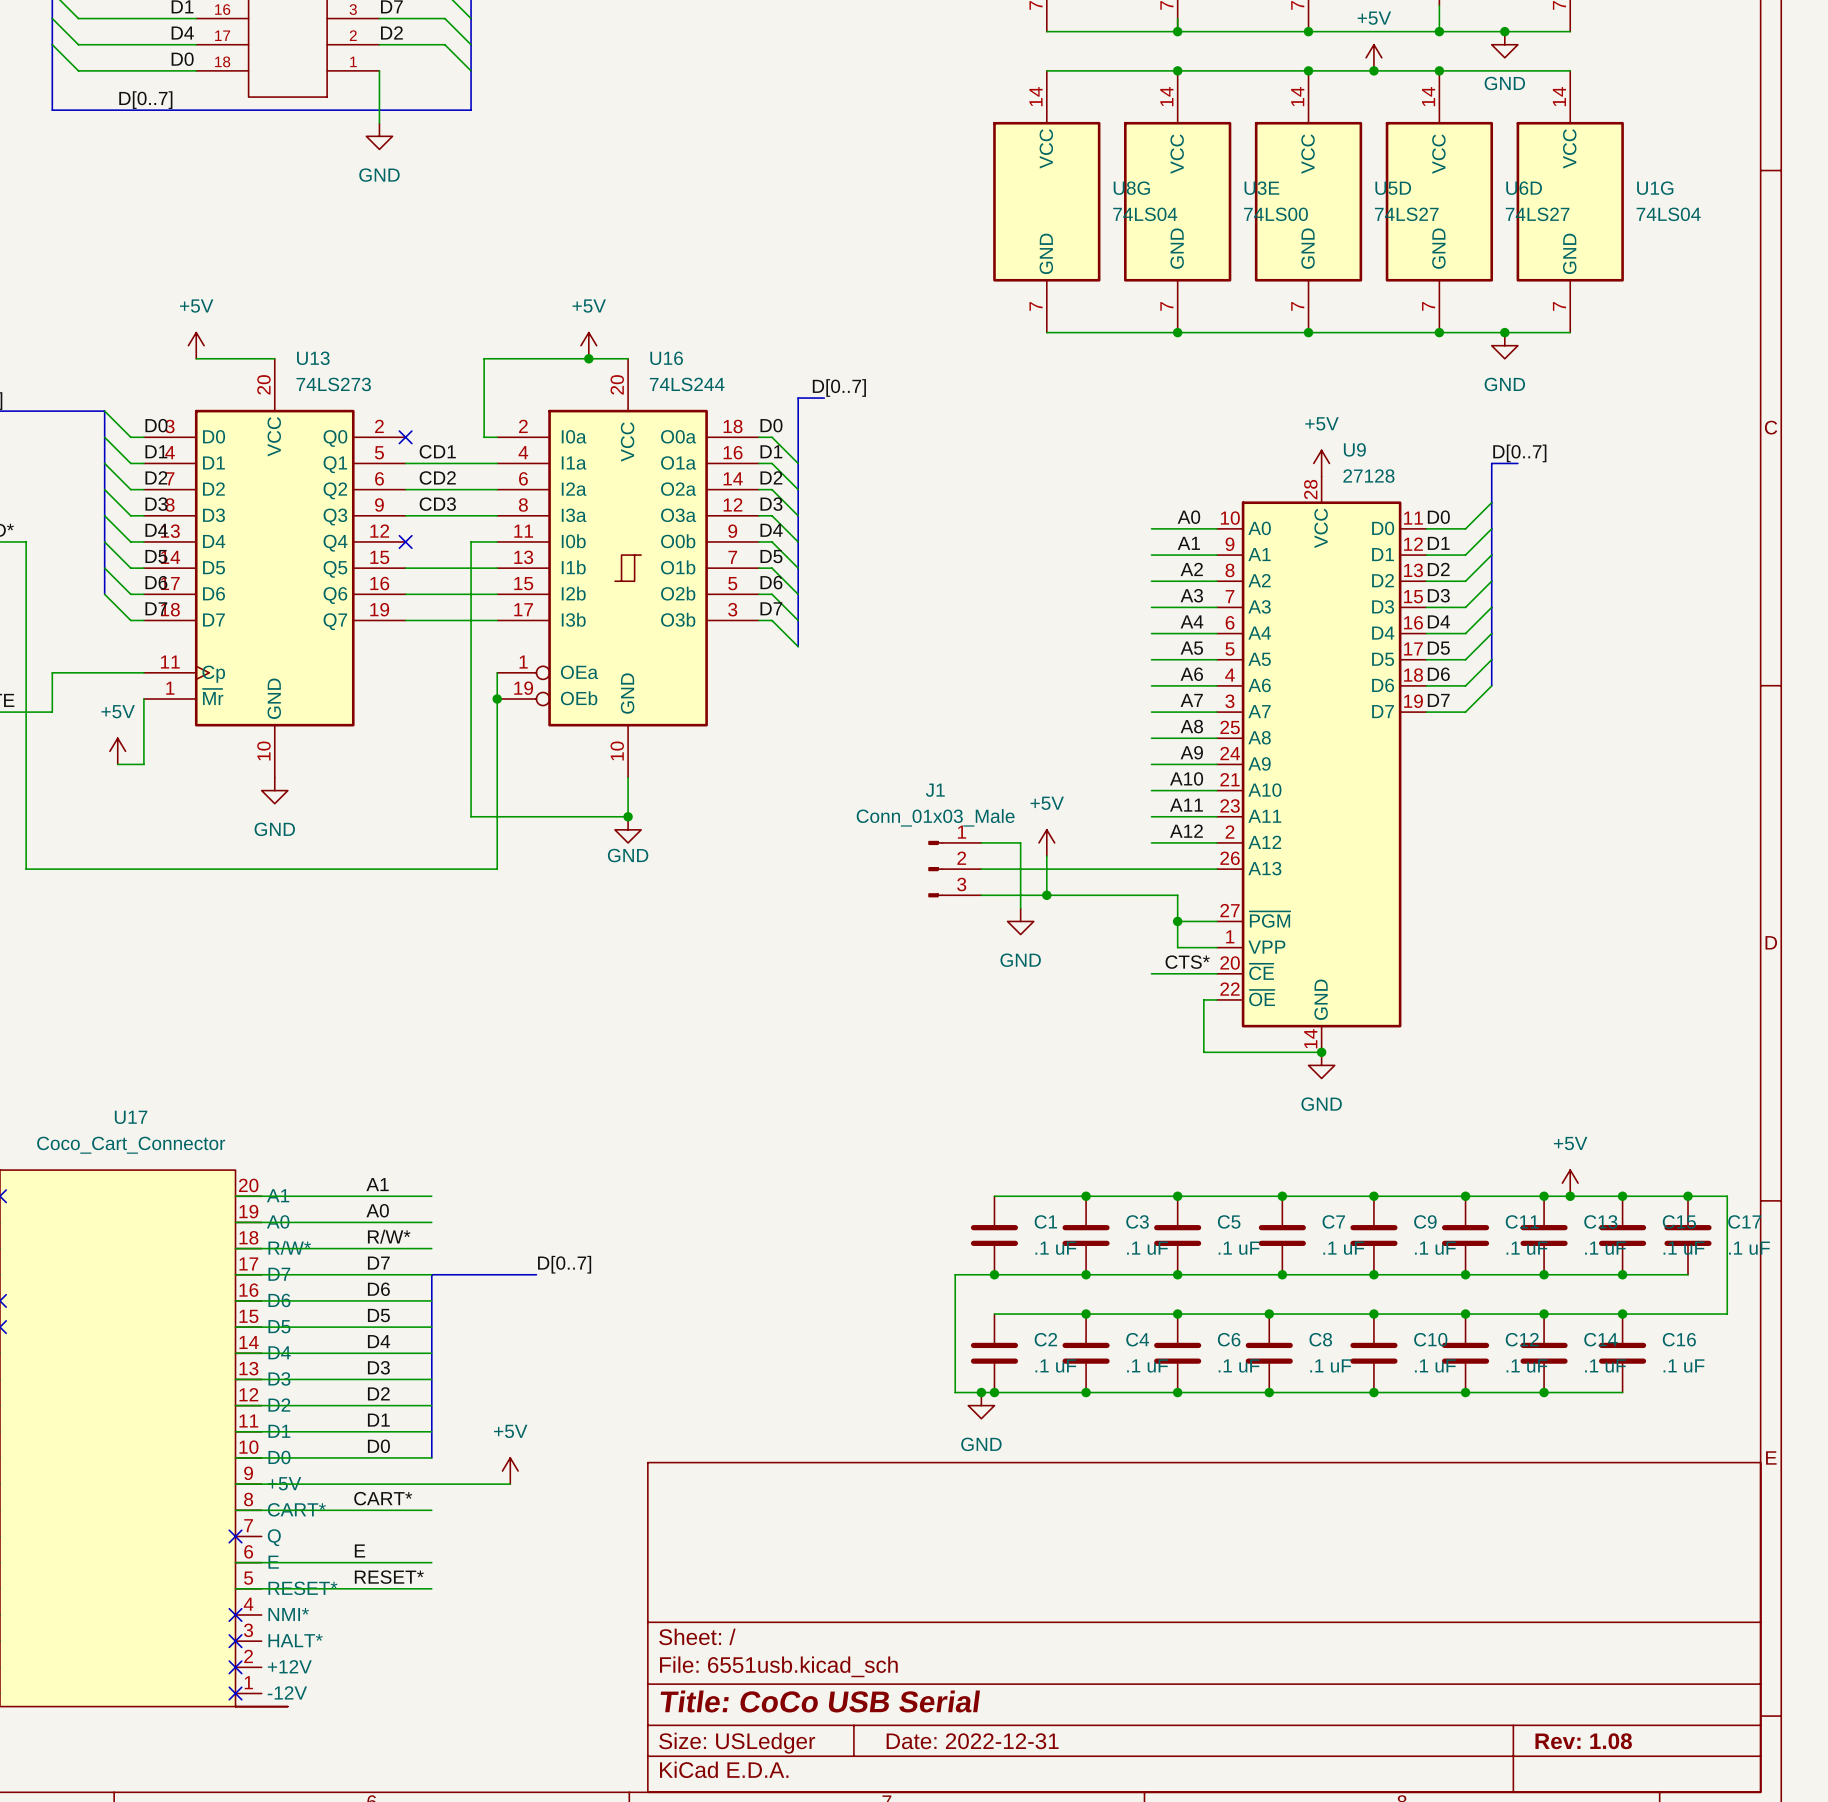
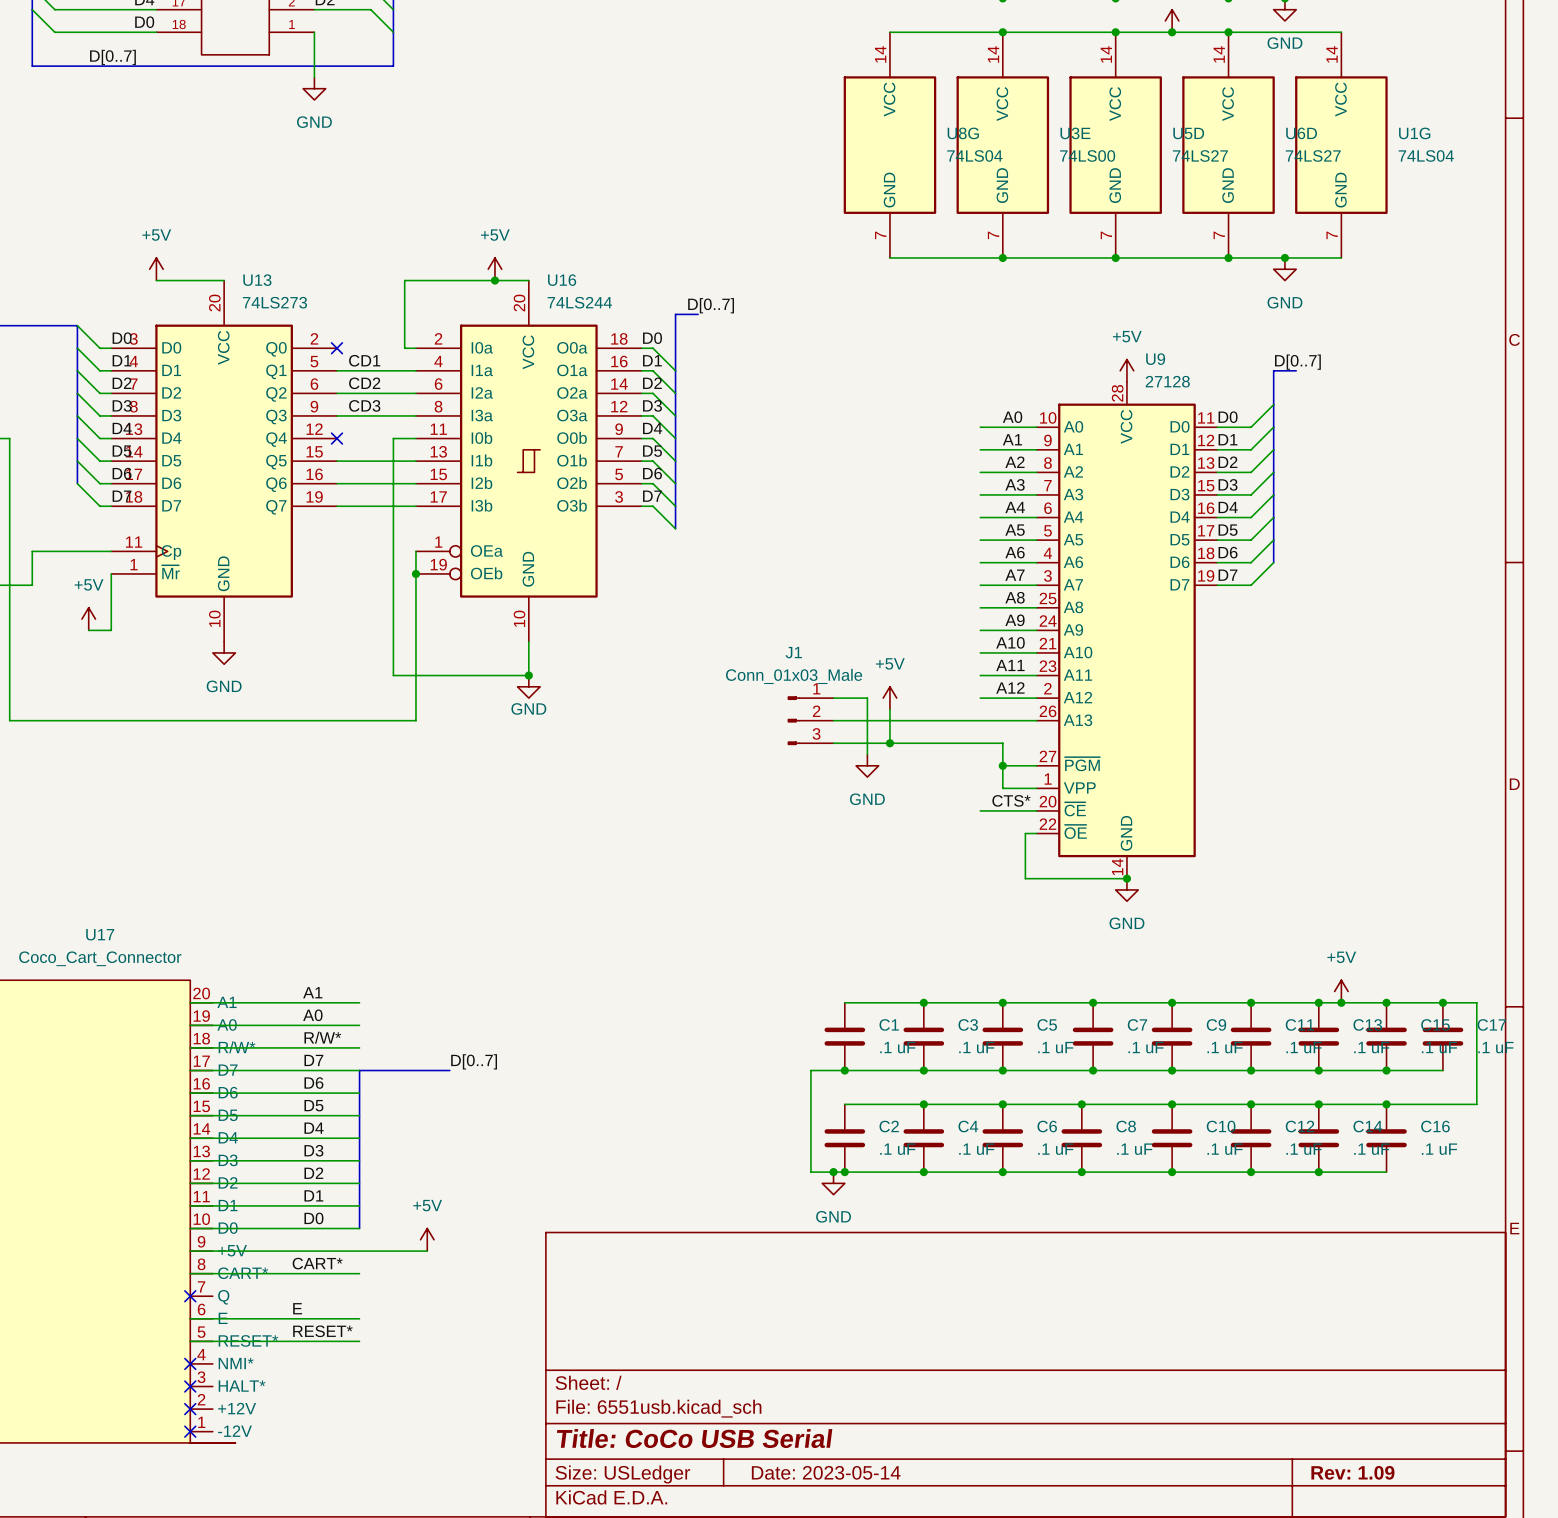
title block: Date: 2022-12-31 (972, 1741) -> Date: 2023-05-14 (826, 1472)
title block: Rev: 1.08 (1583, 1741) -> Rev: 1.09 (1352, 1472)

